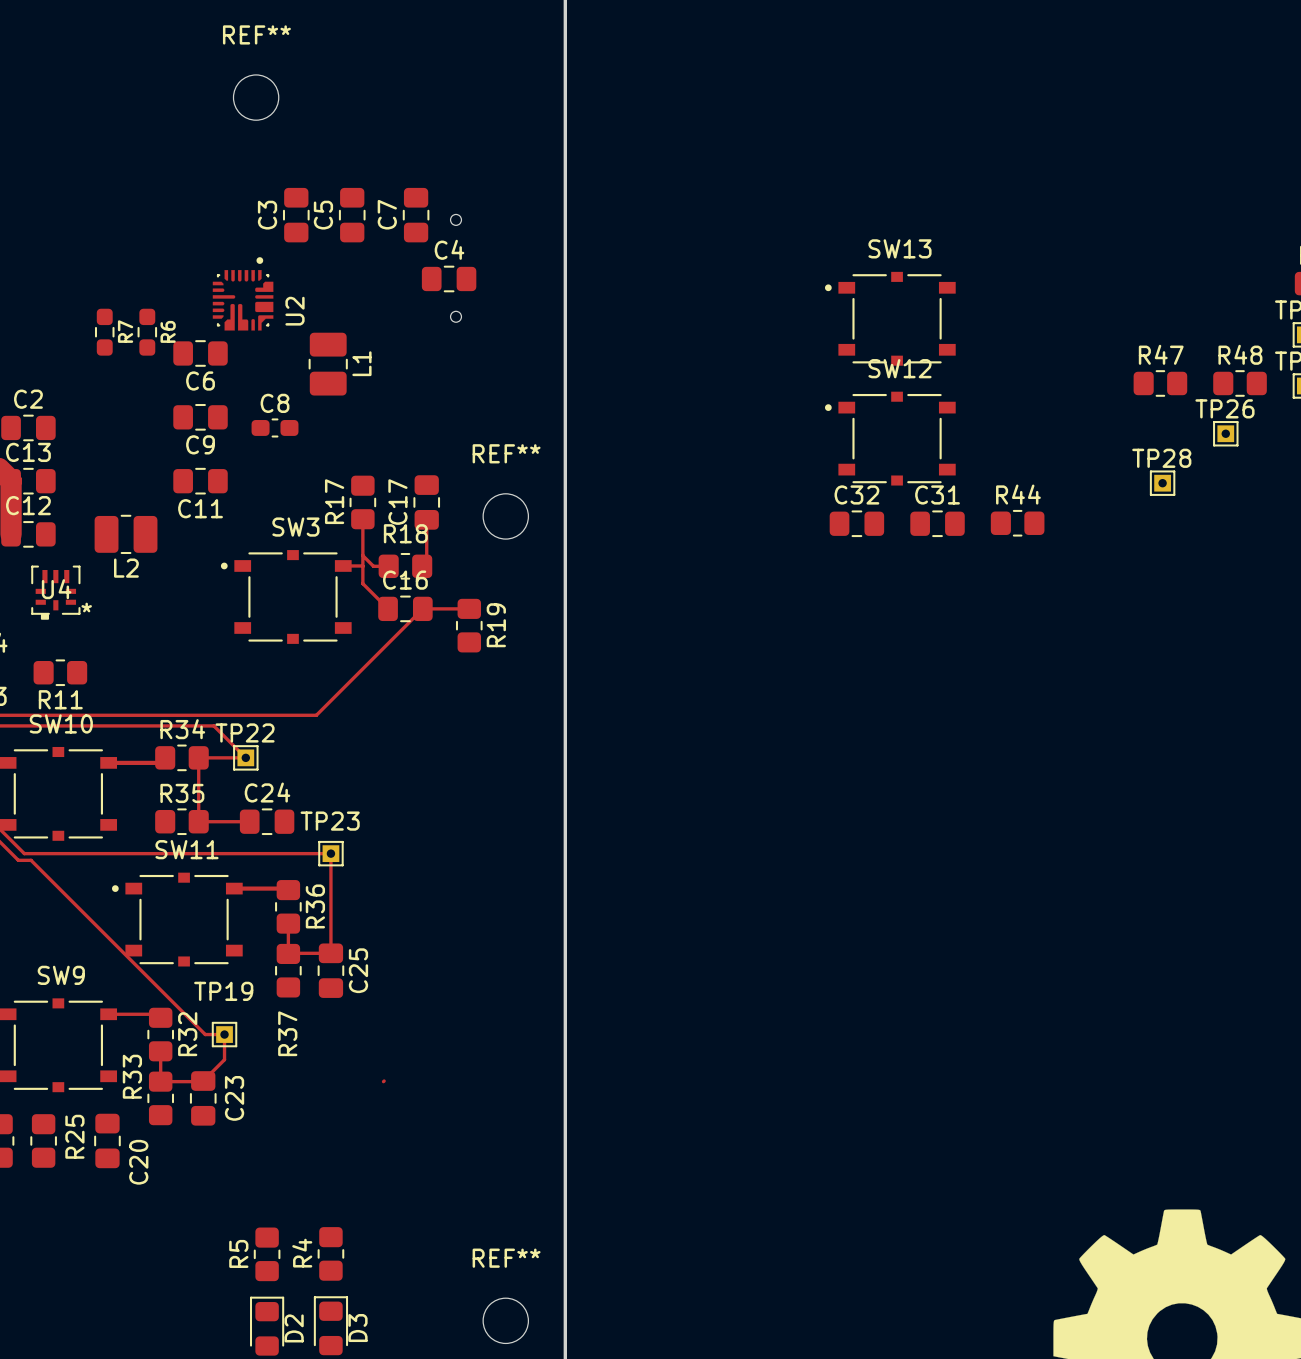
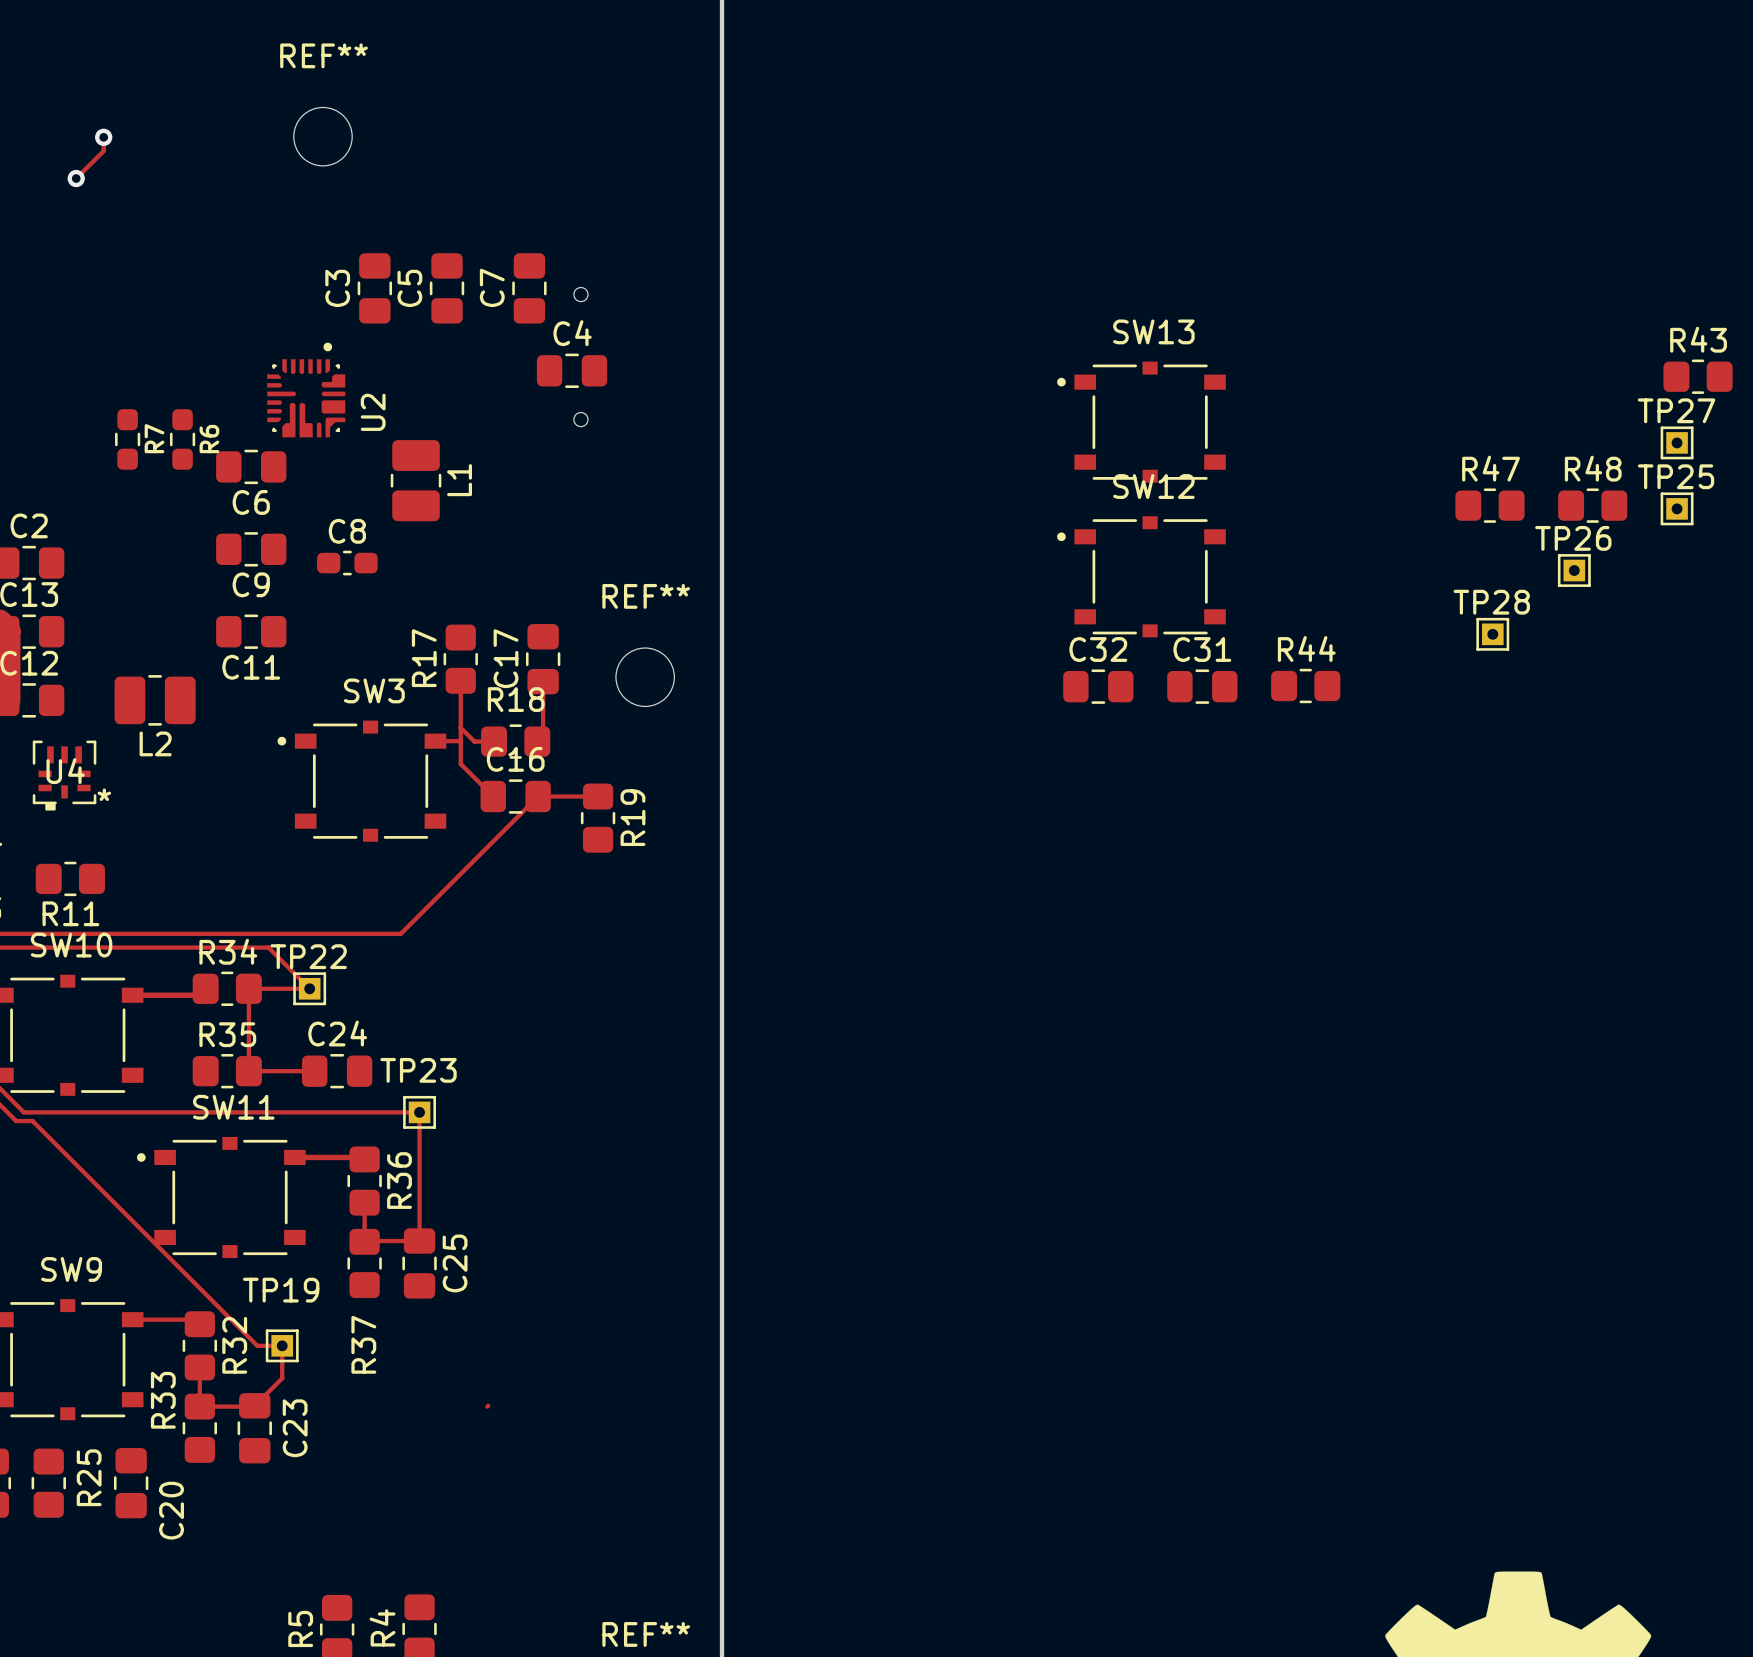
track: none -> (103, 137) (103, 151) (76, 178)
via: none -> (103, 137)
via: none -> (76, 178)

